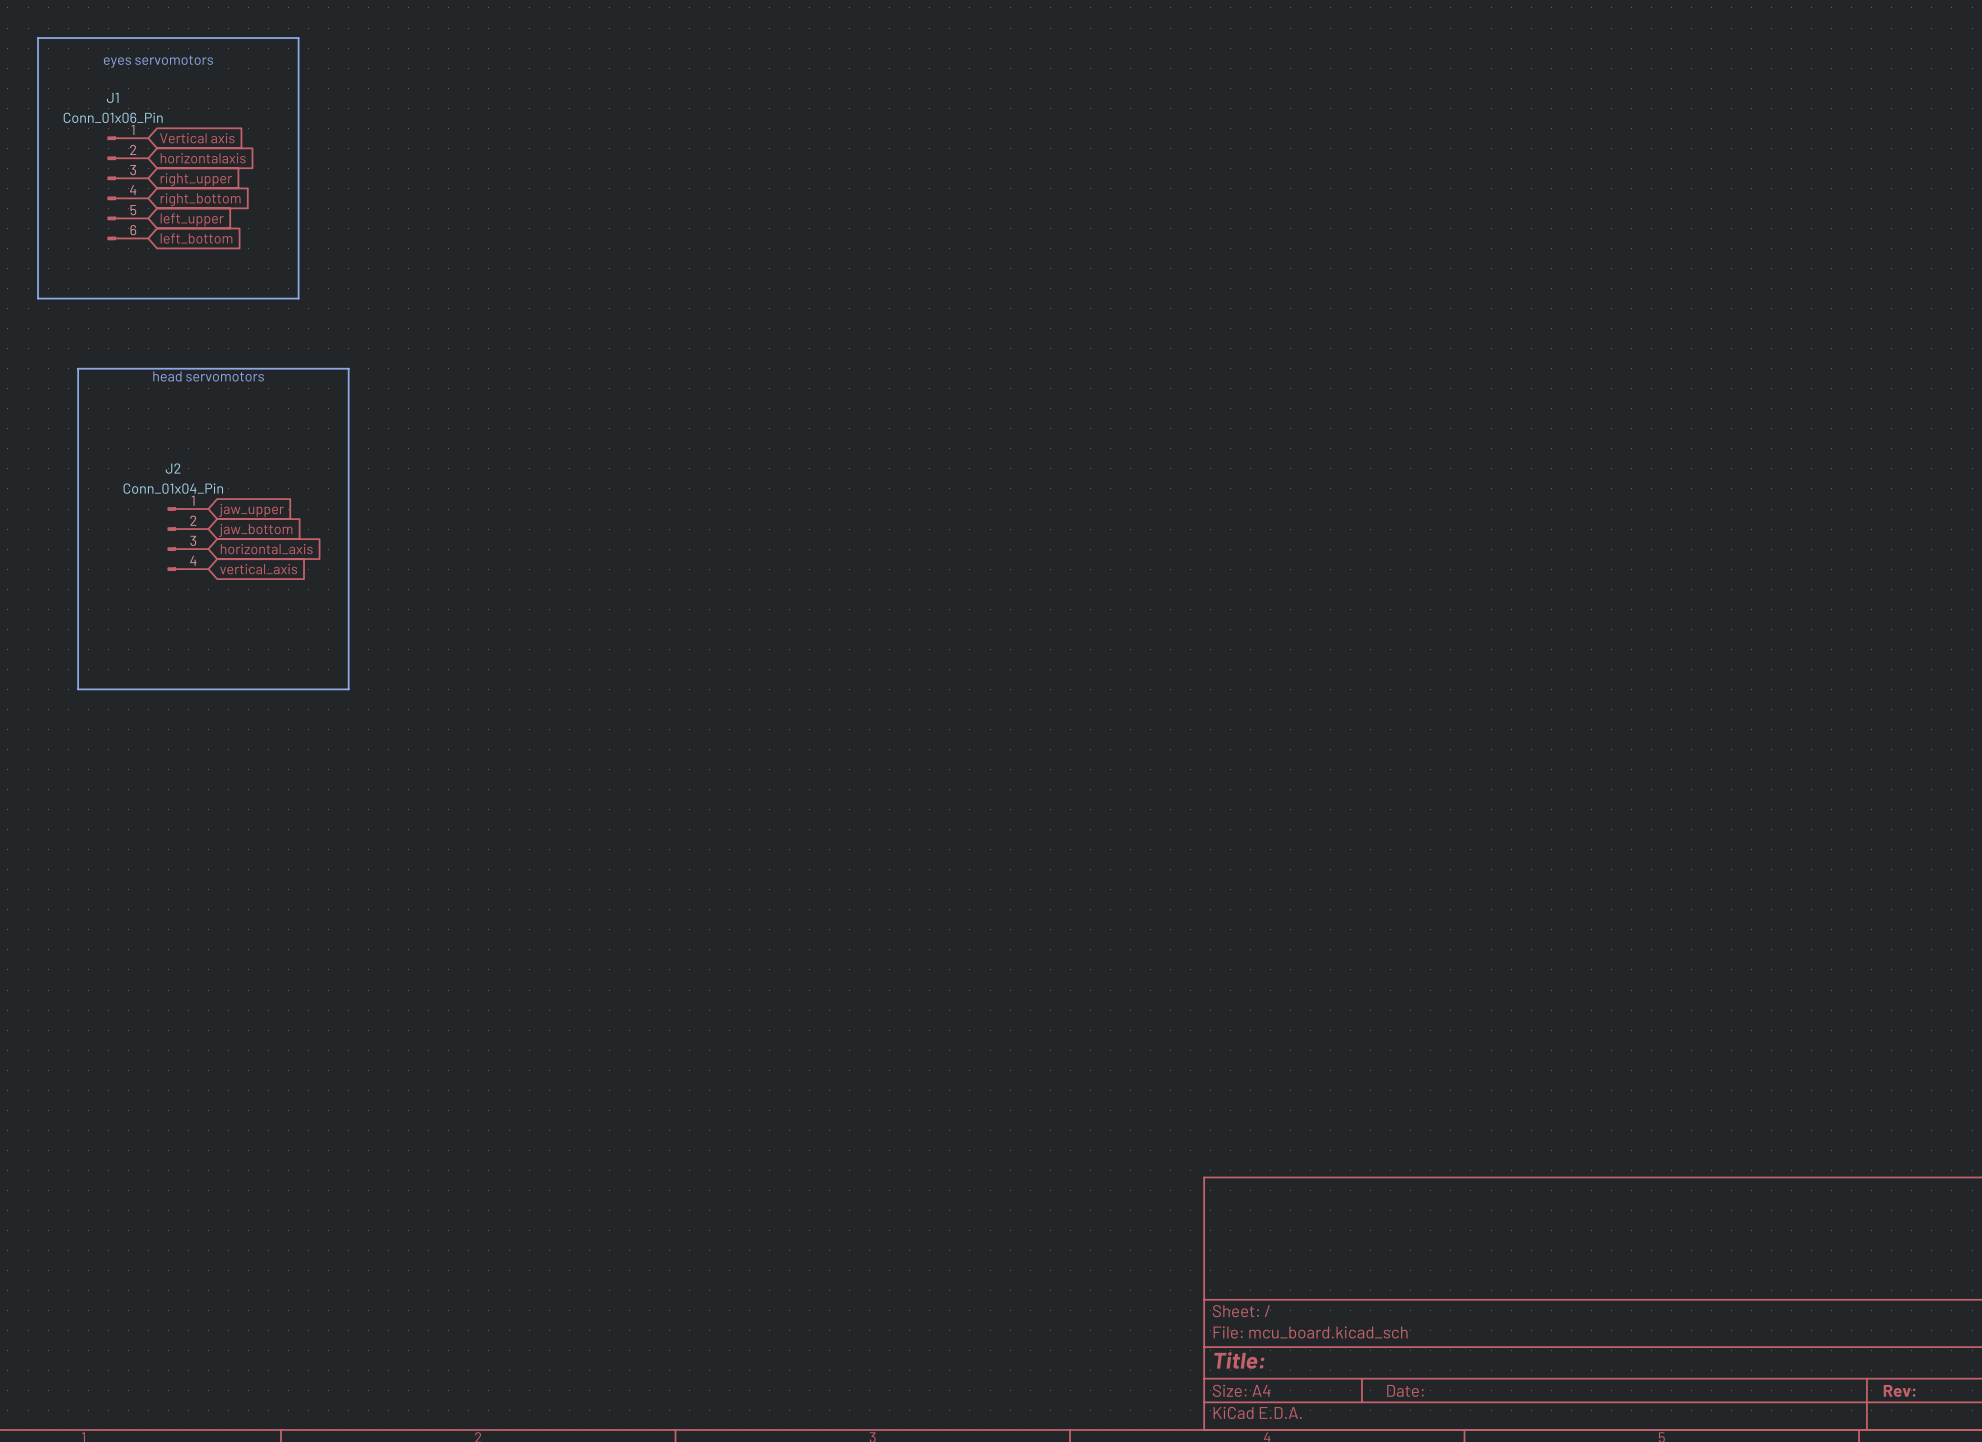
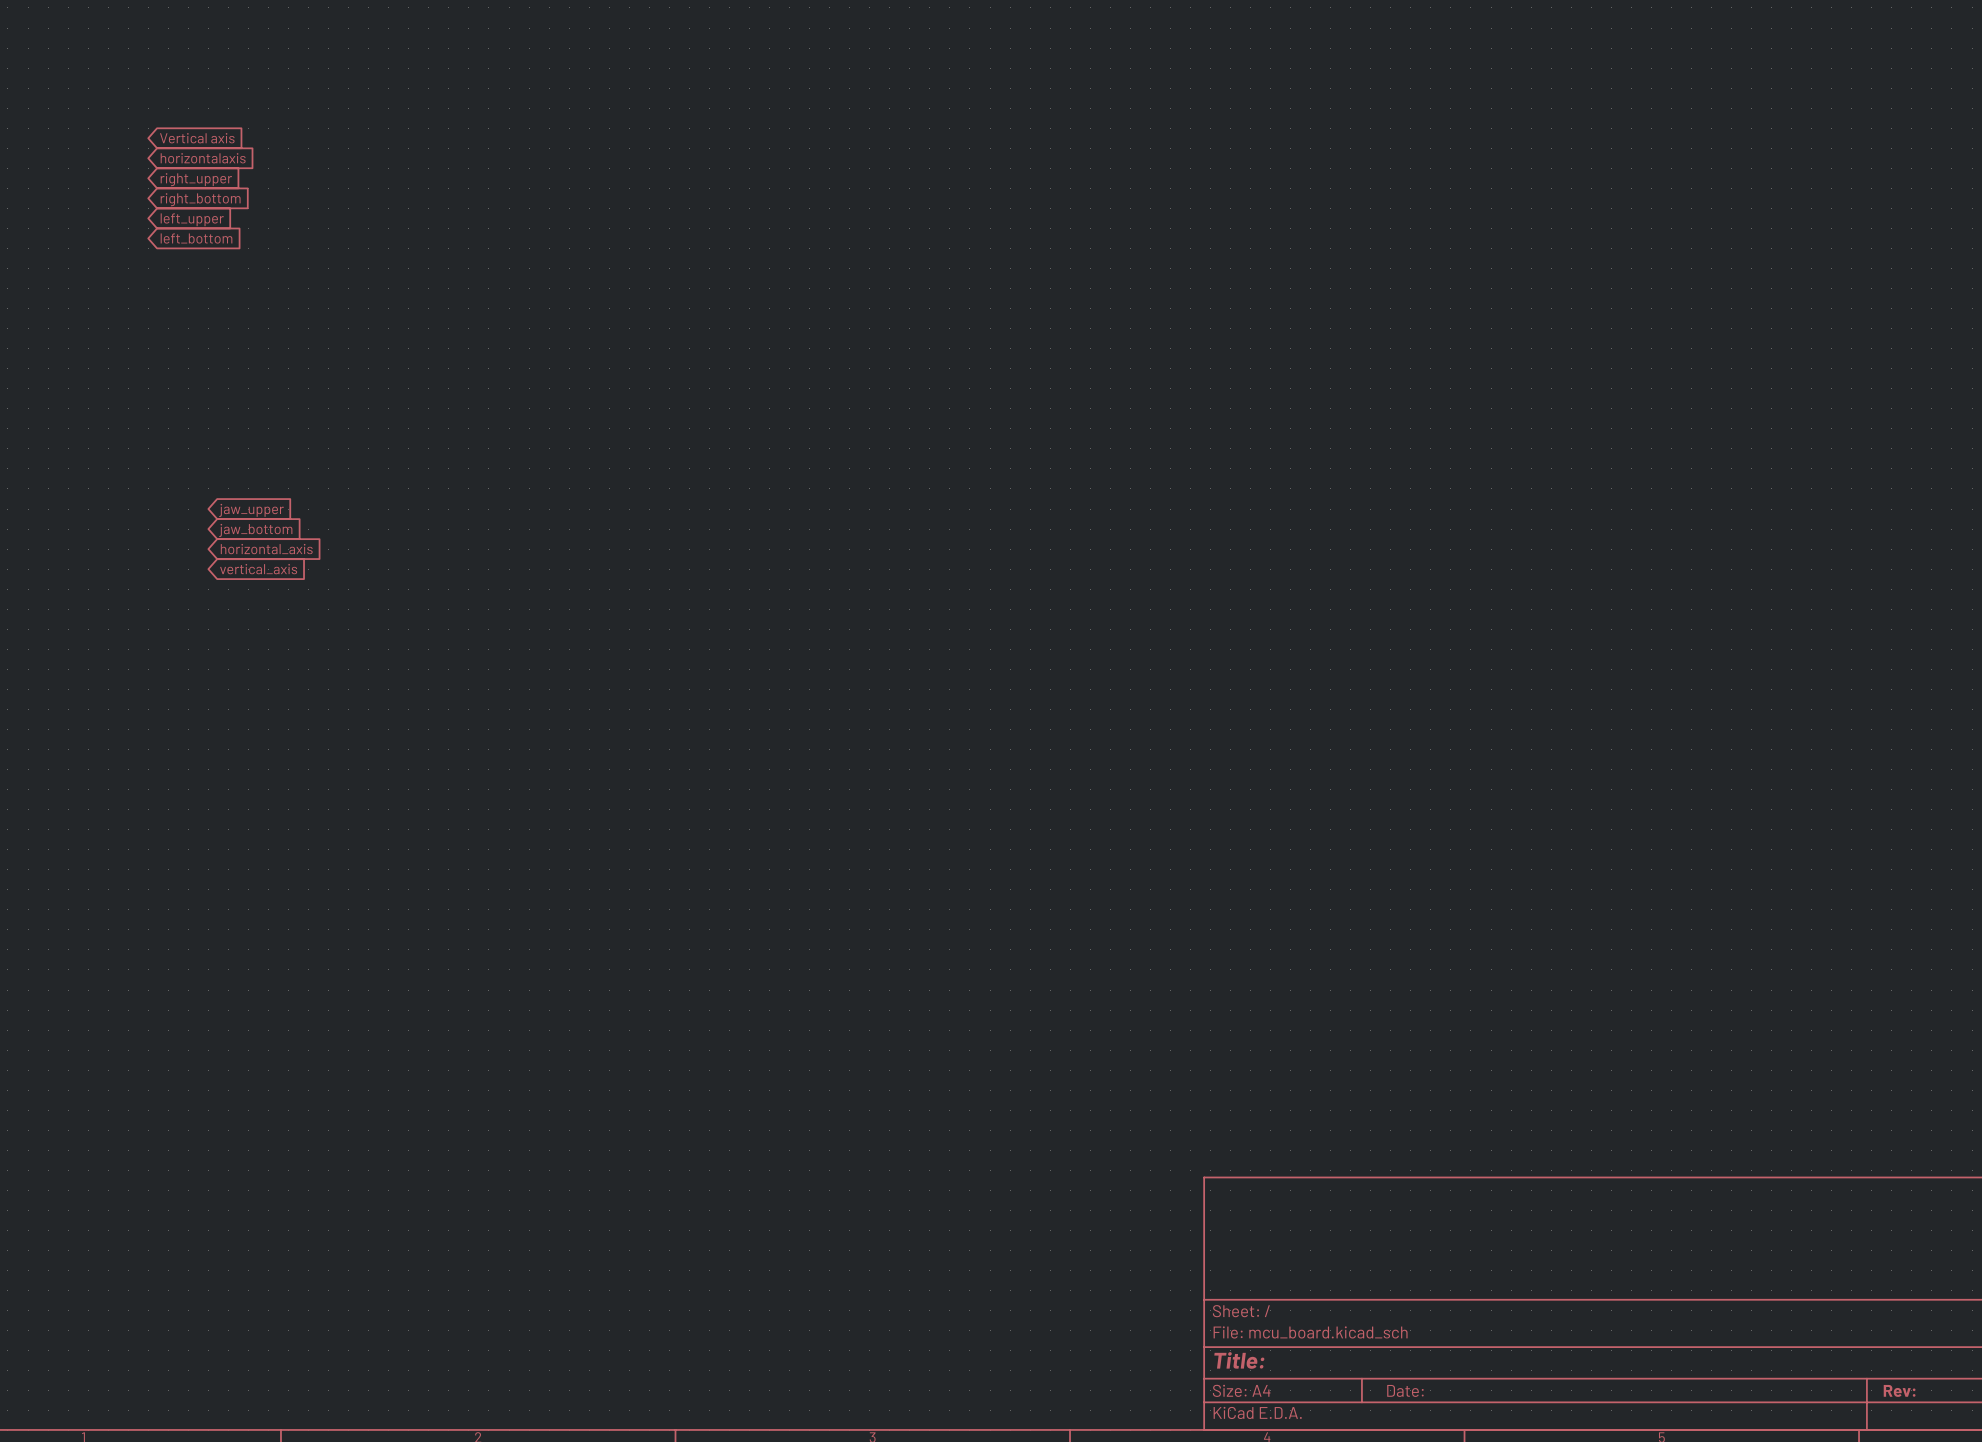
line: (38, 38) (298, 38) (298, 298) (38, 298) (38, 38) -> none
text: eyes servomotors (158, 61) -> none
J1: Conn_01x06_Pin (127, 188) -> none
line: (78, 368) (348, 368) (348, 689) (78, 689) (78, 368) -> none
text: head servomotors (208, 376) -> none
J2: Conn_01x04_Pin (188, 539) -> none

